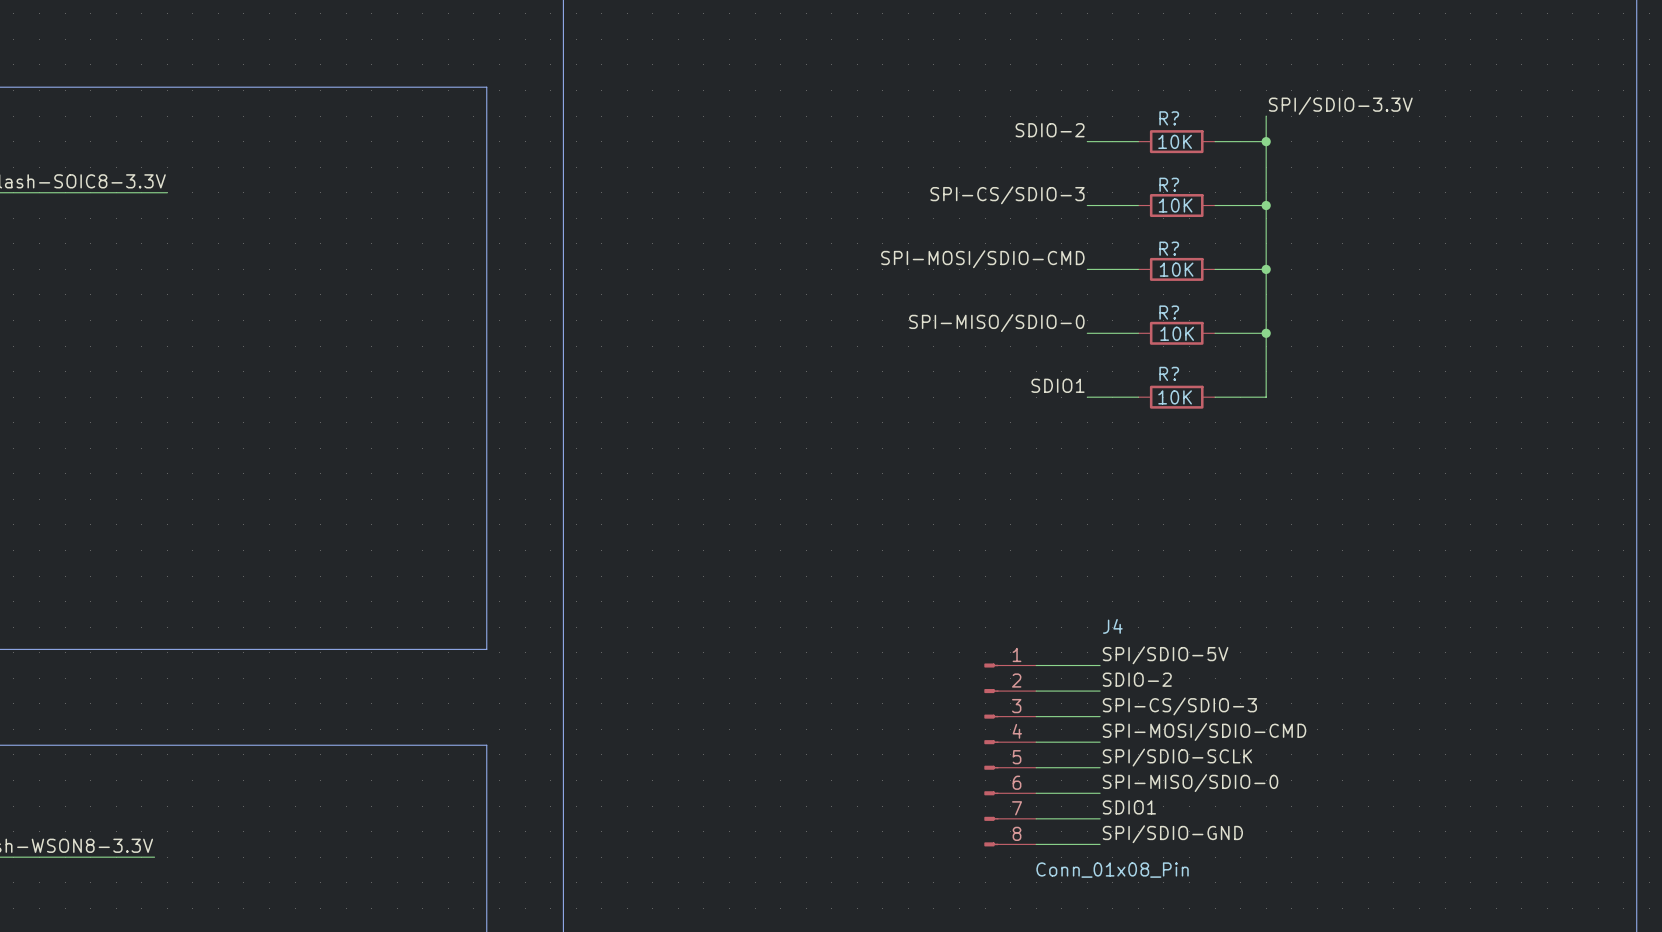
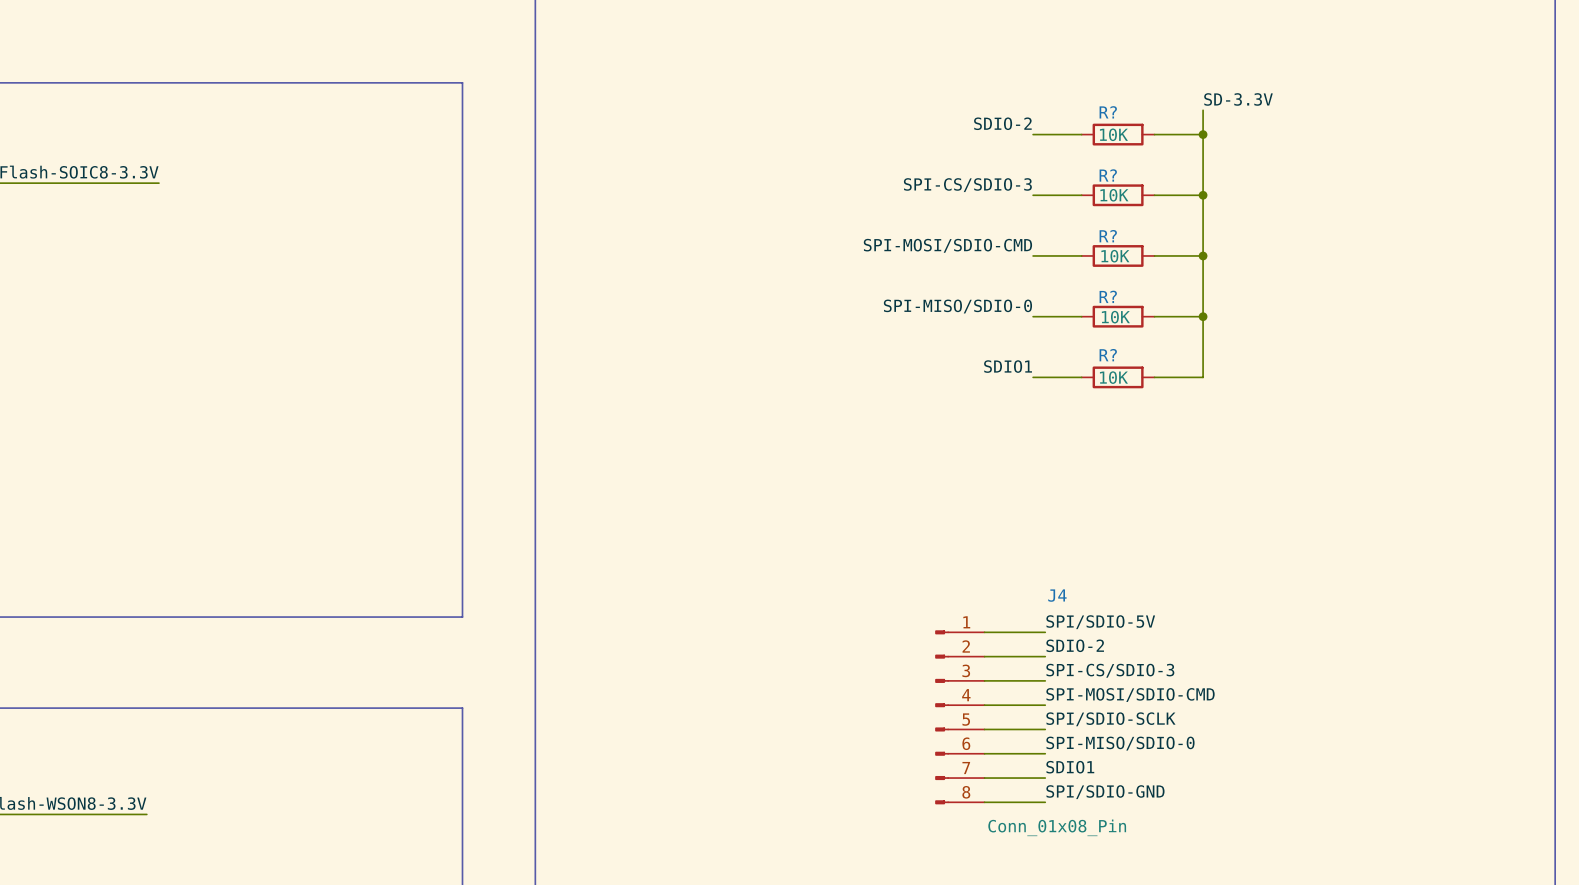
label: SPI/SDIO-3.3V (1340, 105) -> SD-3.3V (1238, 99)

